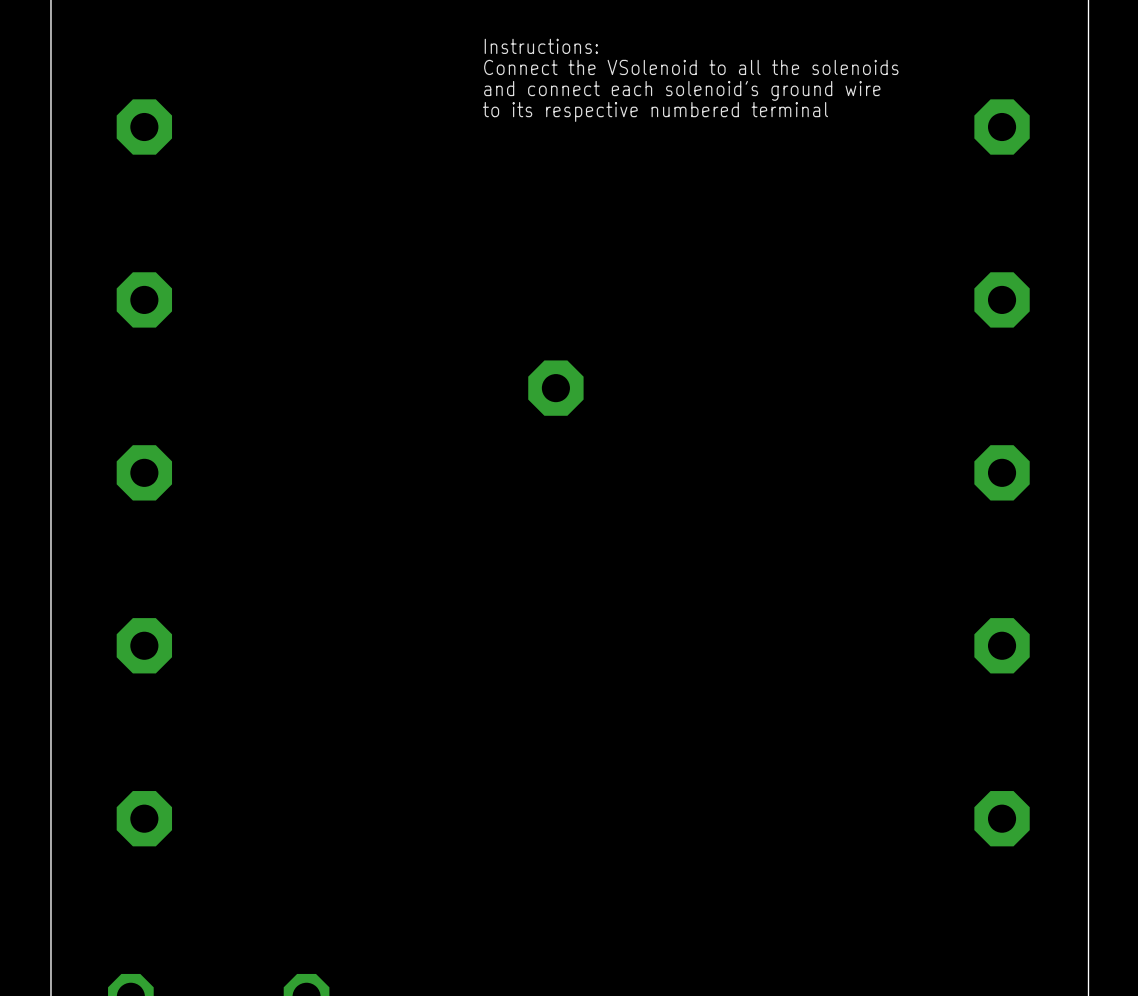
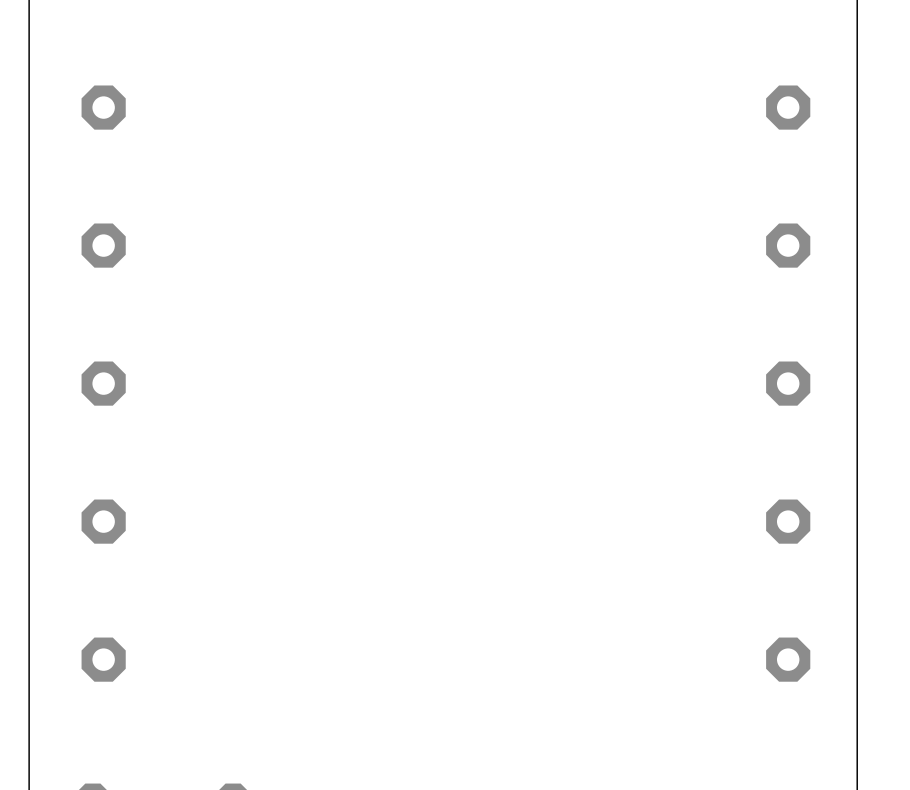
text: Instructions: (541, 46) -> none
text: Connect the VSolenoid to all the solenoids (691, 67) -> none
text: and connect each solenoid's ground wire (682, 90) -> none
text: to its respective numbered terminal (655, 111) -> none
part: (555, 388) -> none

